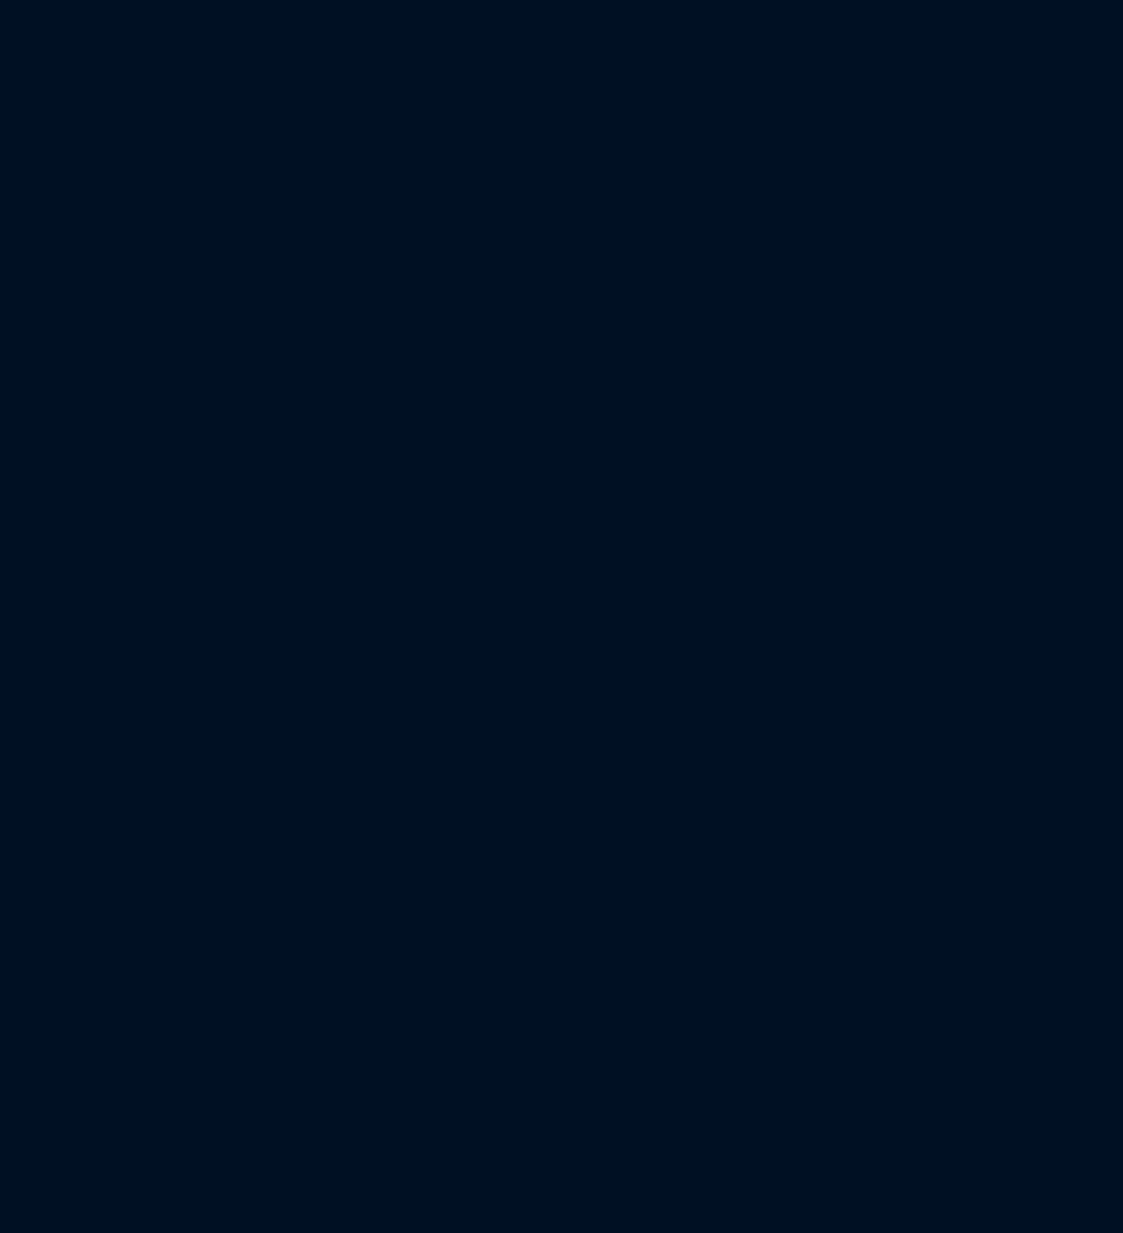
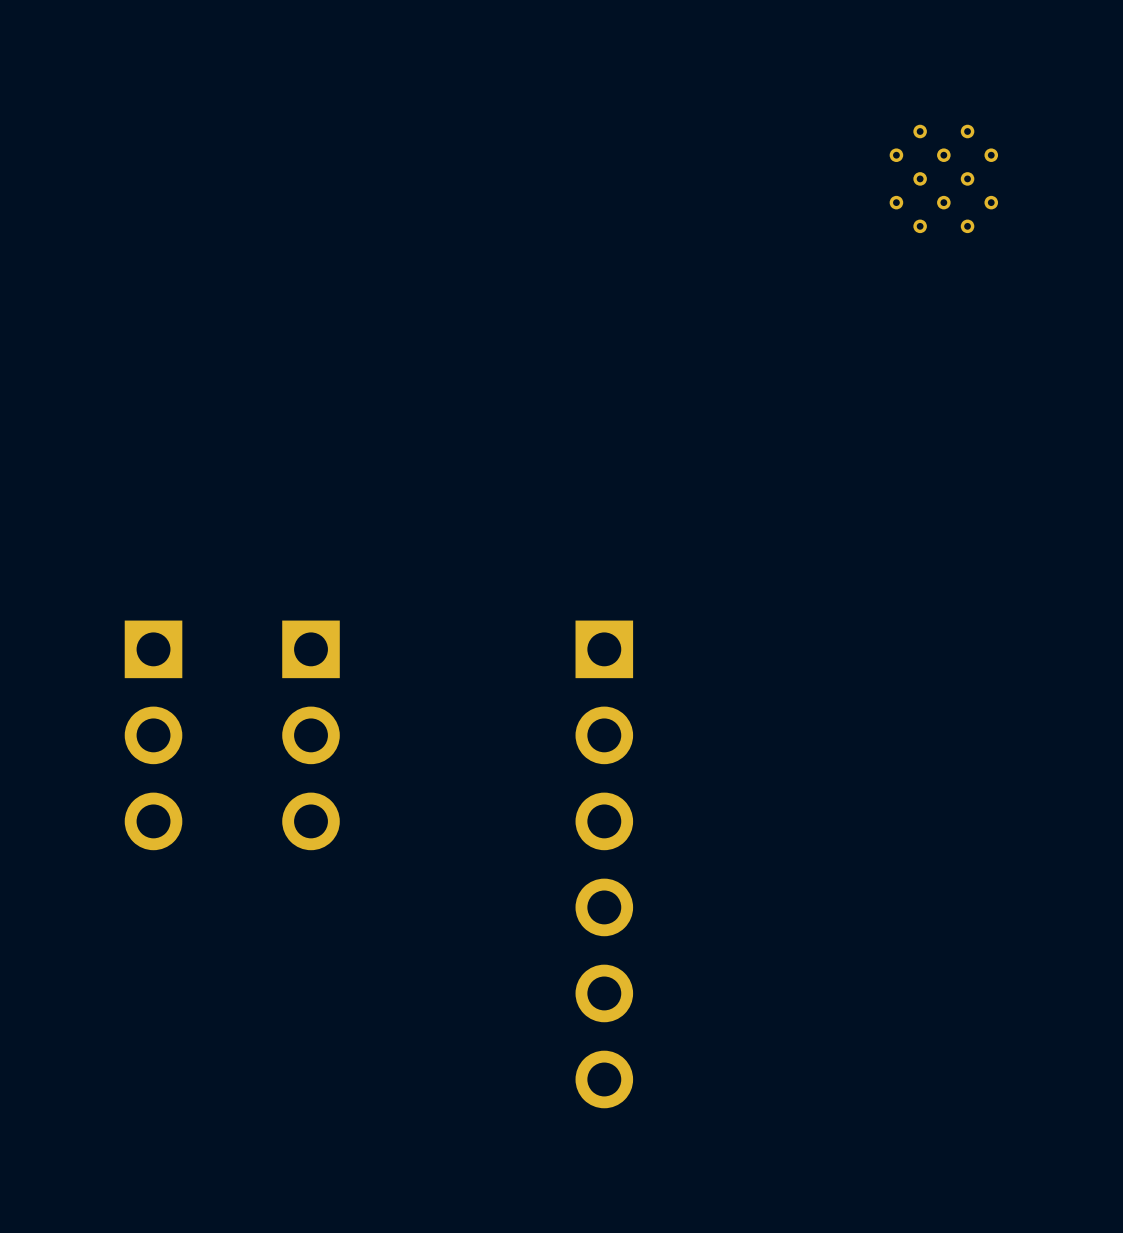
part: none -> (943, 178)
part: none -> (153, 735)
part: none -> (311, 735)
part: none -> (604, 864)

